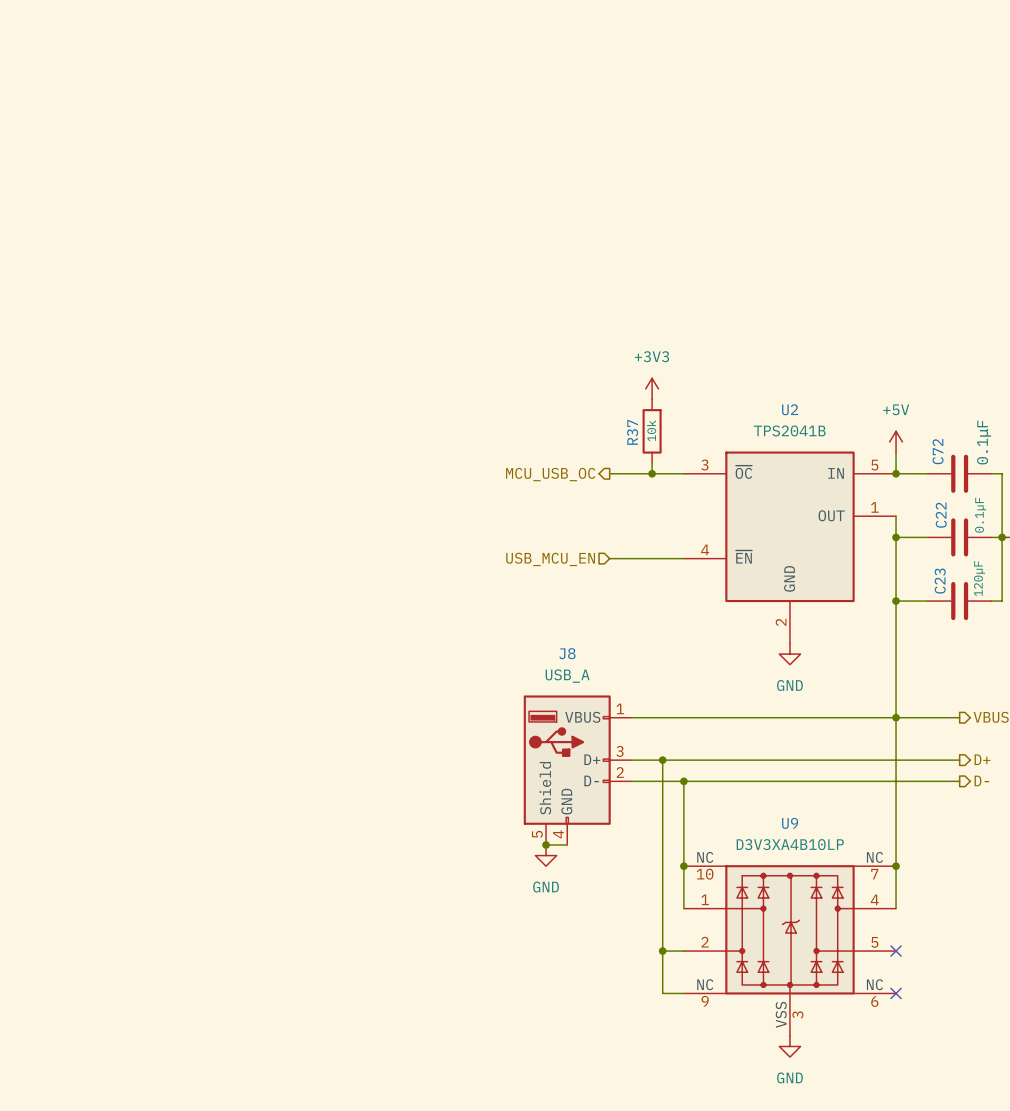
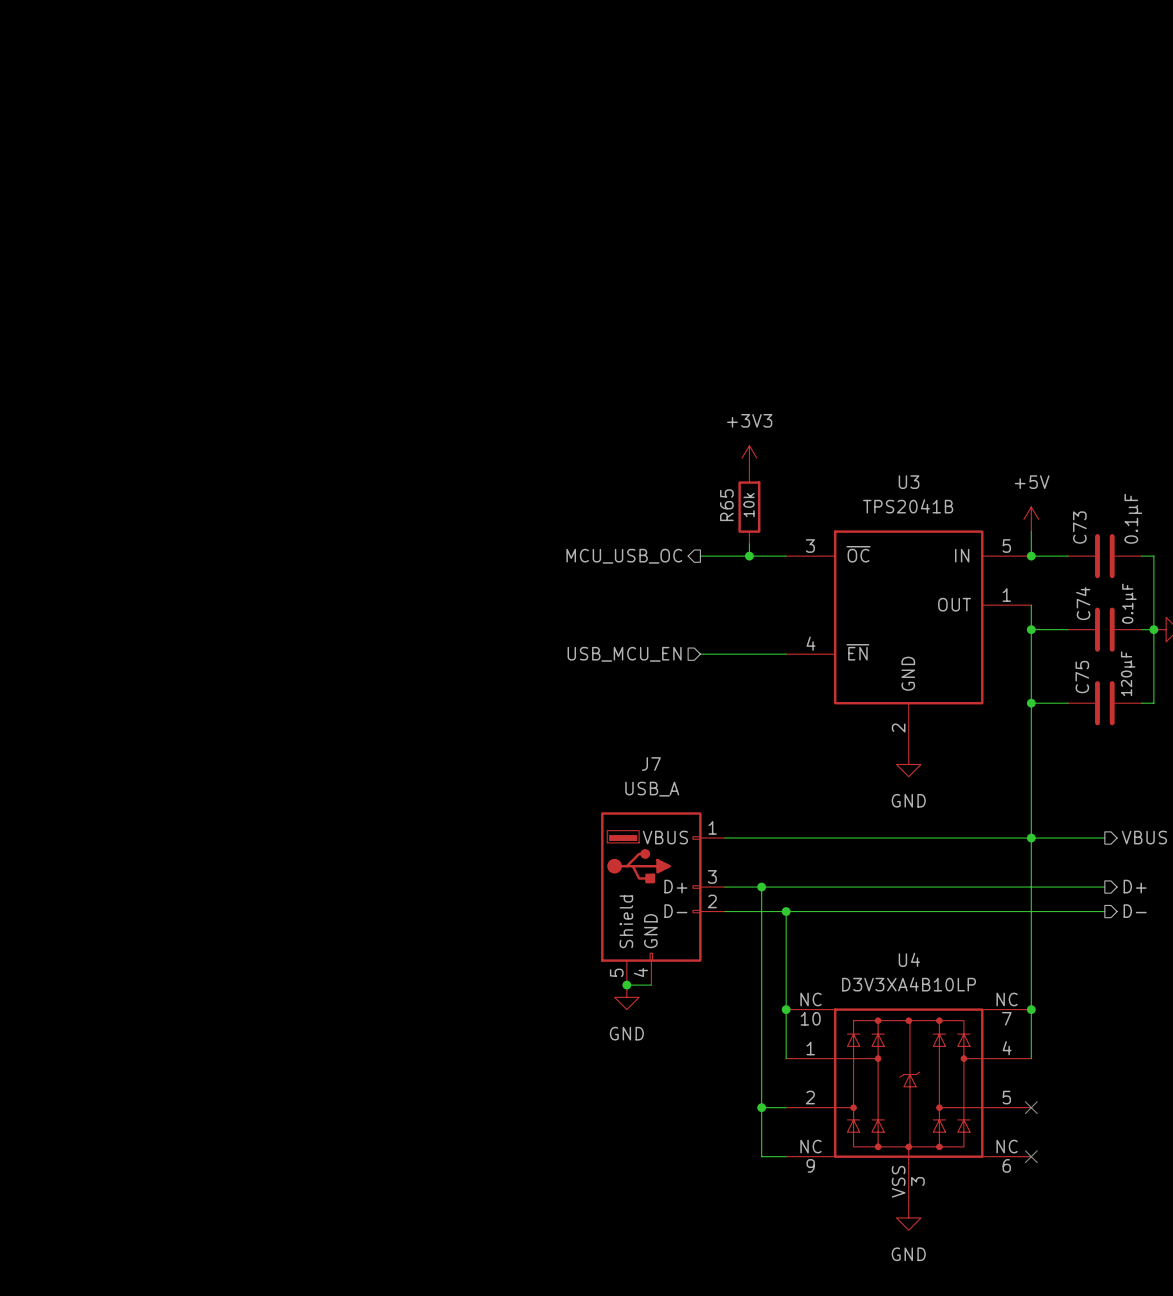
U2 name: U2 (790, 409) -> U3 (909, 482)
R37 name: R37 (632, 432) -> R65 (726, 505)
C72 name: C72 (938, 451) -> C73 (1079, 527)
C22 name: C22 (941, 515) -> C74 (1083, 603)
C23 name: C23 (940, 581) -> C75 (1082, 677)
J8 name: J8 (567, 653) -> J7 (651, 764)
U9 name: U9 (790, 823) -> U4 (909, 959)

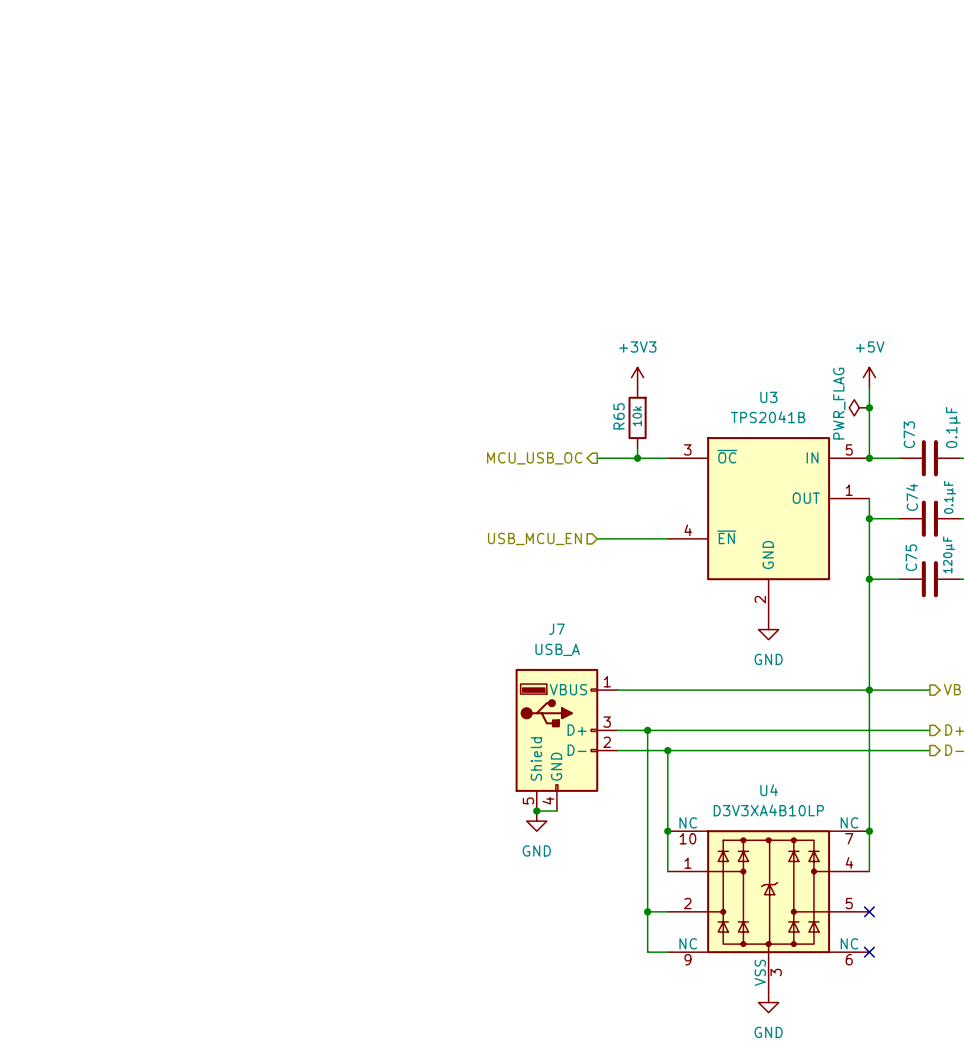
power symbol: none -> PWR_FLAG (859, 407)
junction: none -> (869, 407)
power symbol position: +5V (1031, 519) -> +5V (869, 377)

